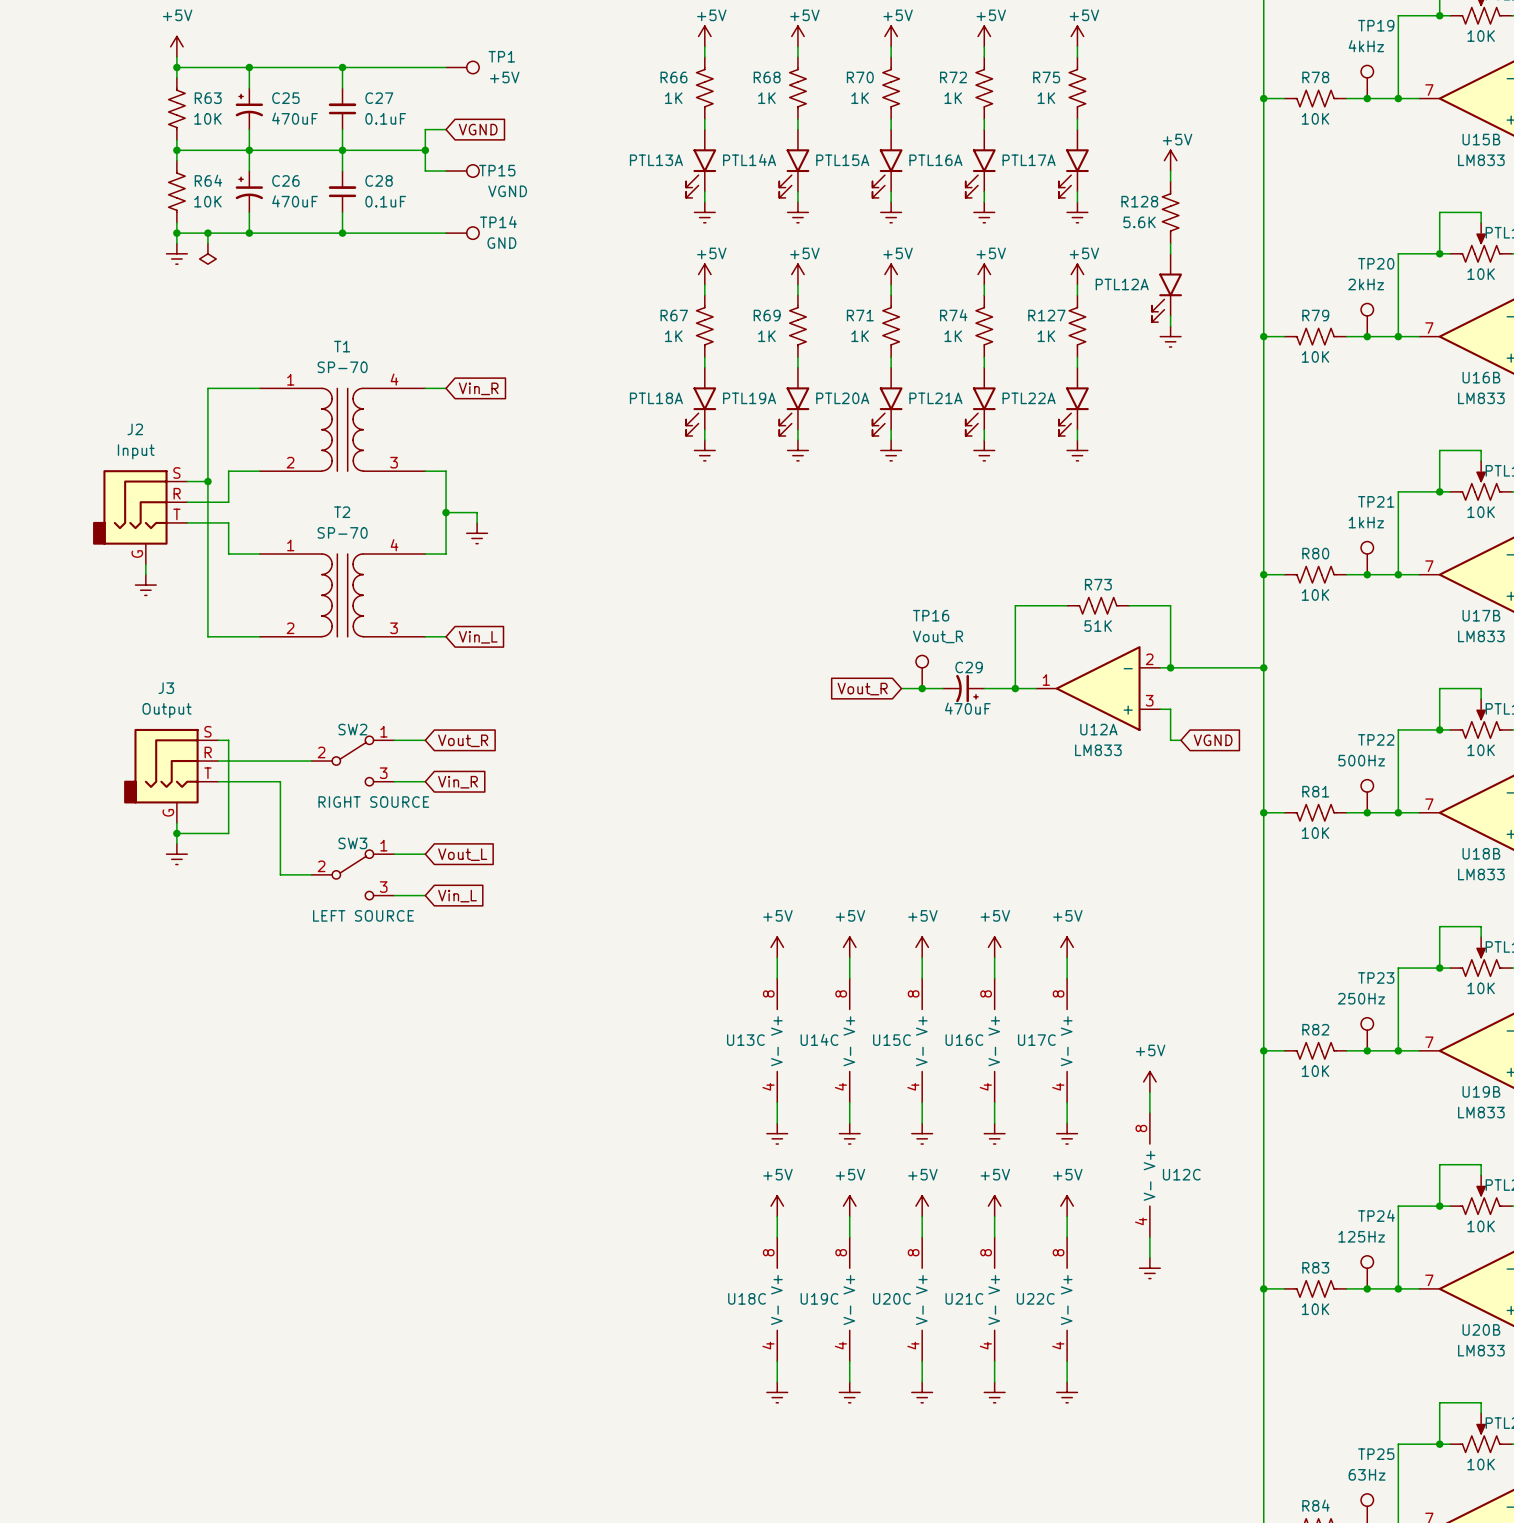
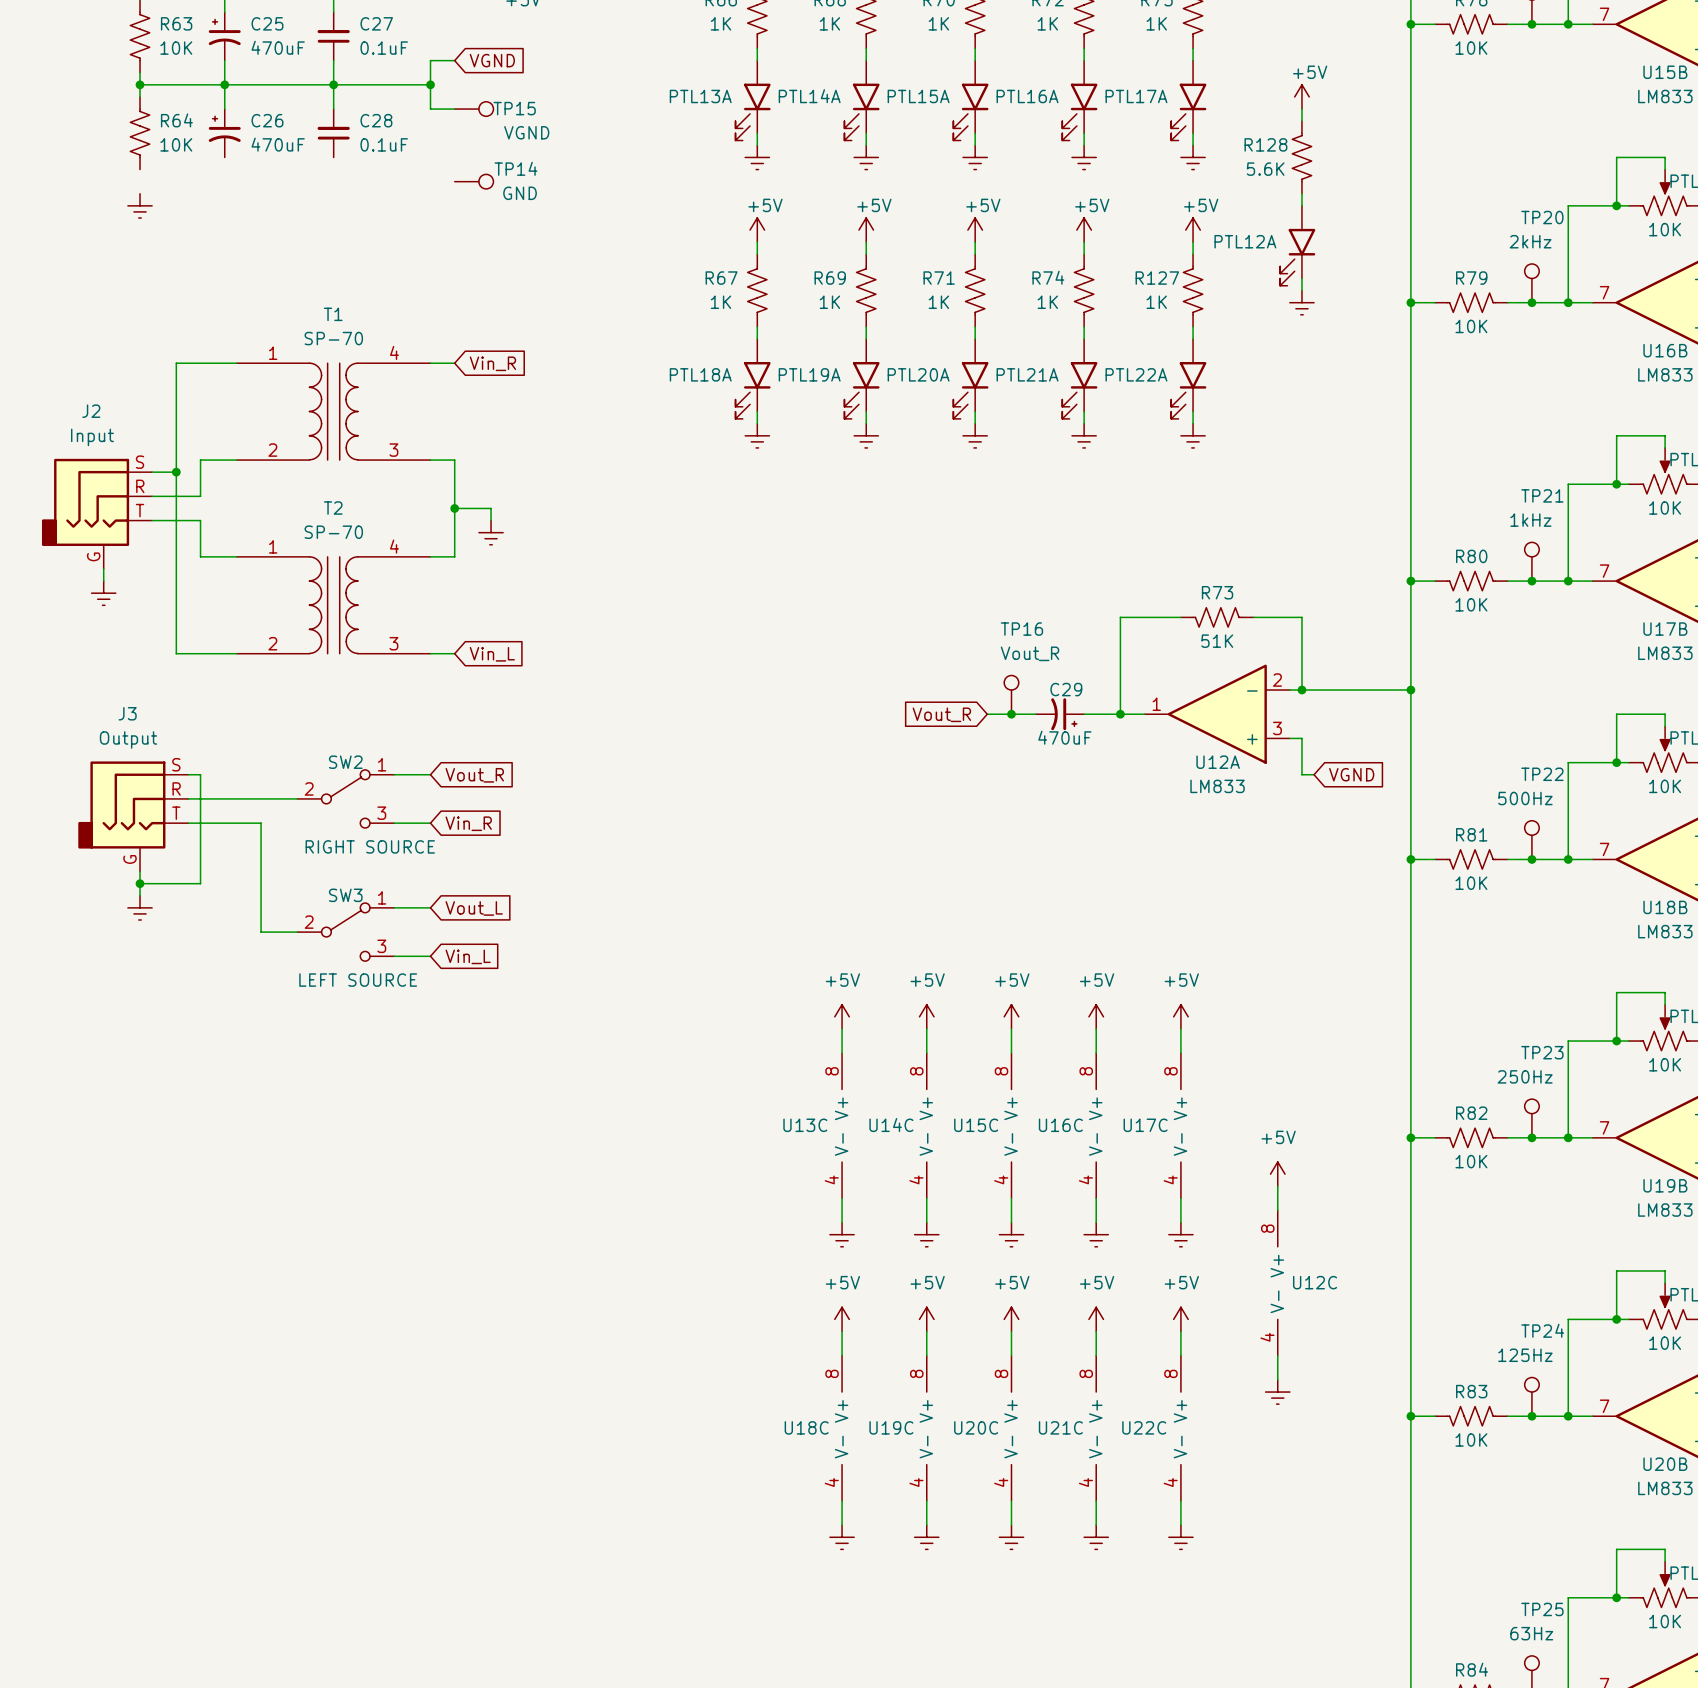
wire: (249, 212) (249, 233) -> none
wire: (342, 212) (342, 233) -> none
wire: (176, 222) (176, 243) -> none
wire: (176, 233) (446, 233) -> none
junction: (176, 233) -> none
wire: (207, 233) (207, 243) -> none
junction: (207, 233) -> none
junction: (249, 233) -> none
junction: (342, 233) -> none
power symbol: (207, 253) -> none

